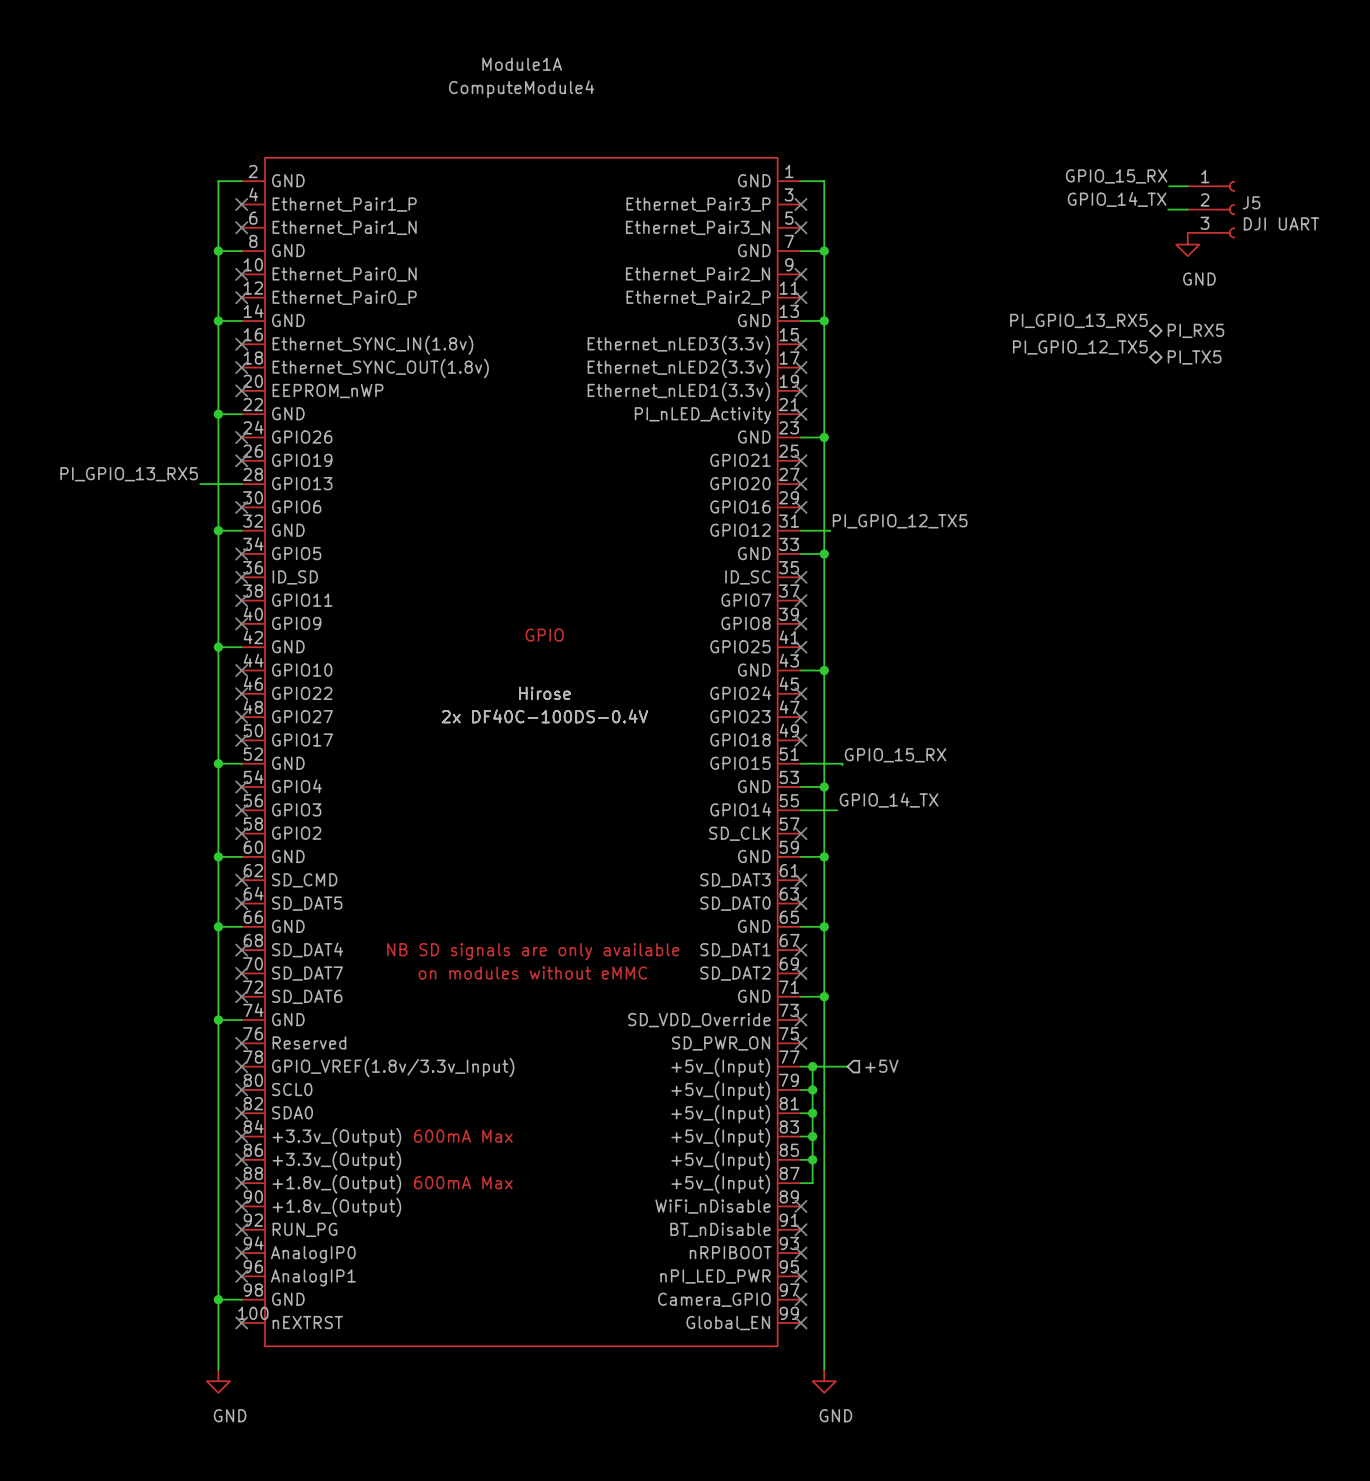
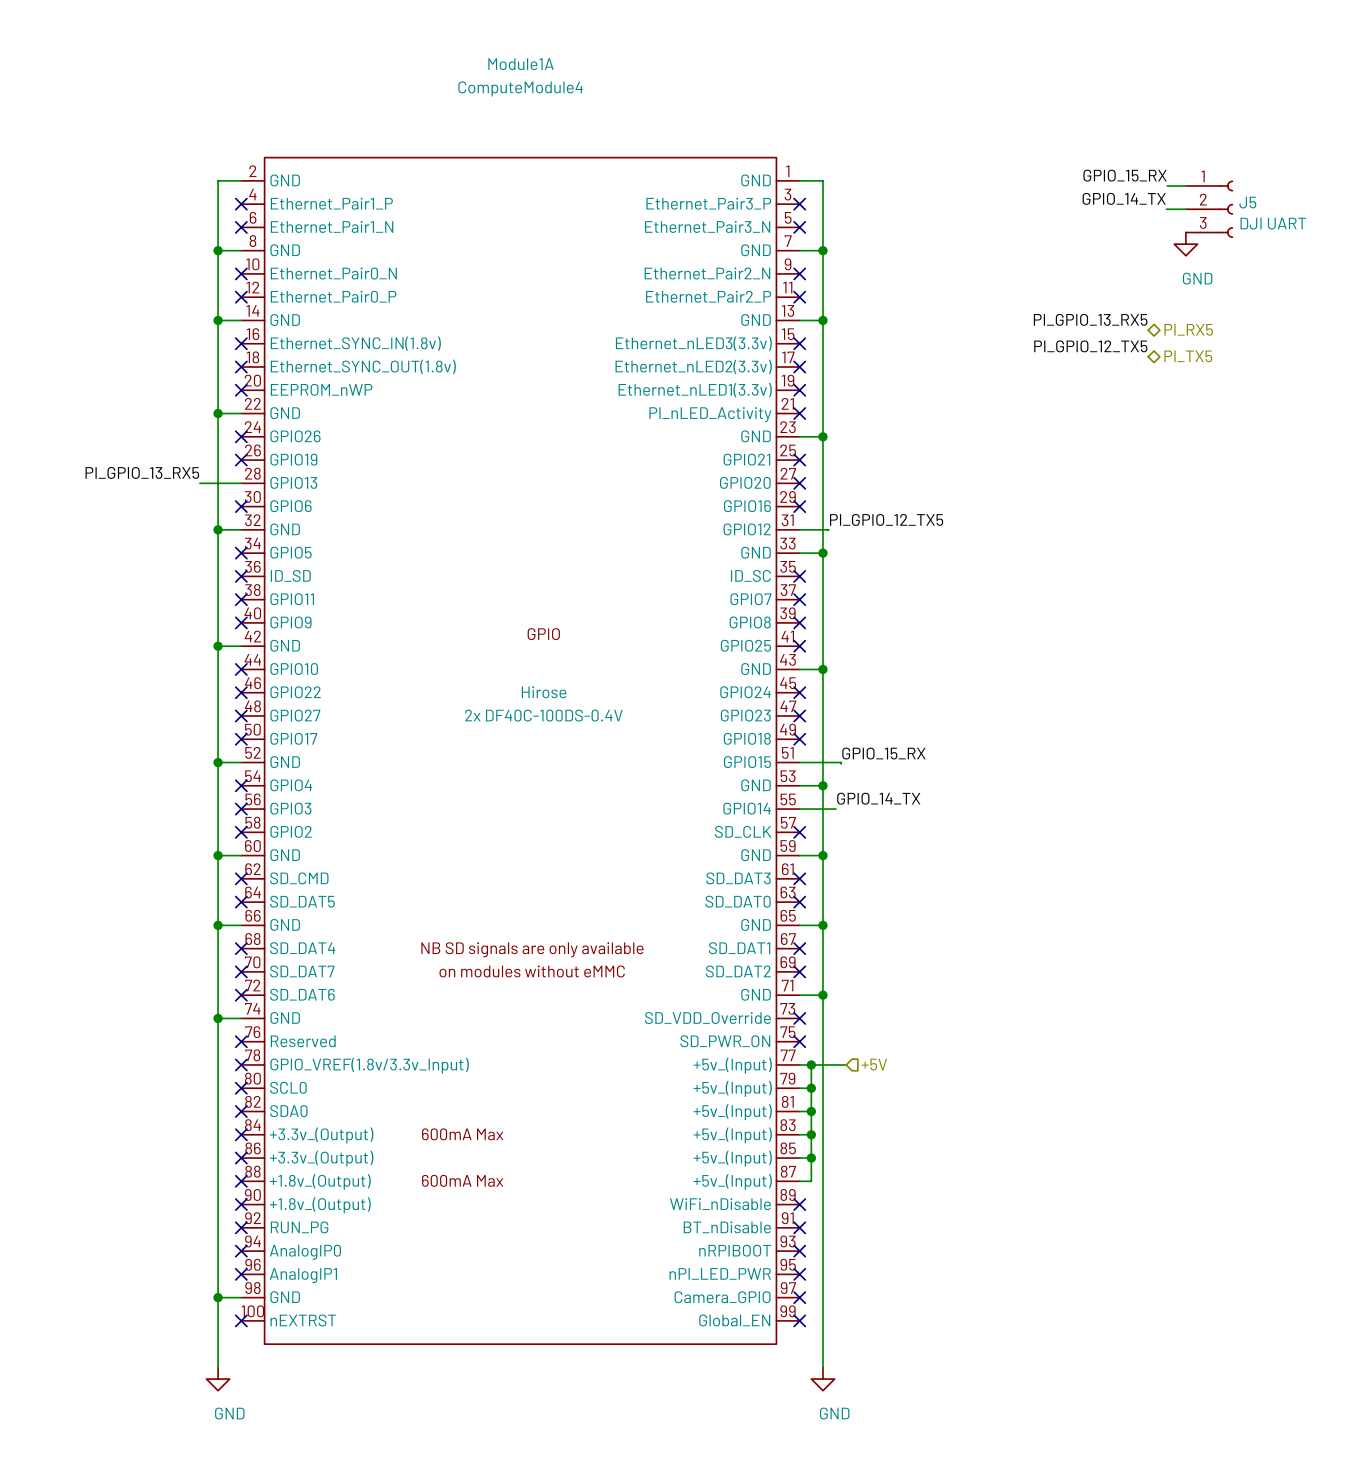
Module1A text: Hirose (544, 693) -> none
Module1A text: 2x DF40C-100DS-0.4V (544, 716) -> none

